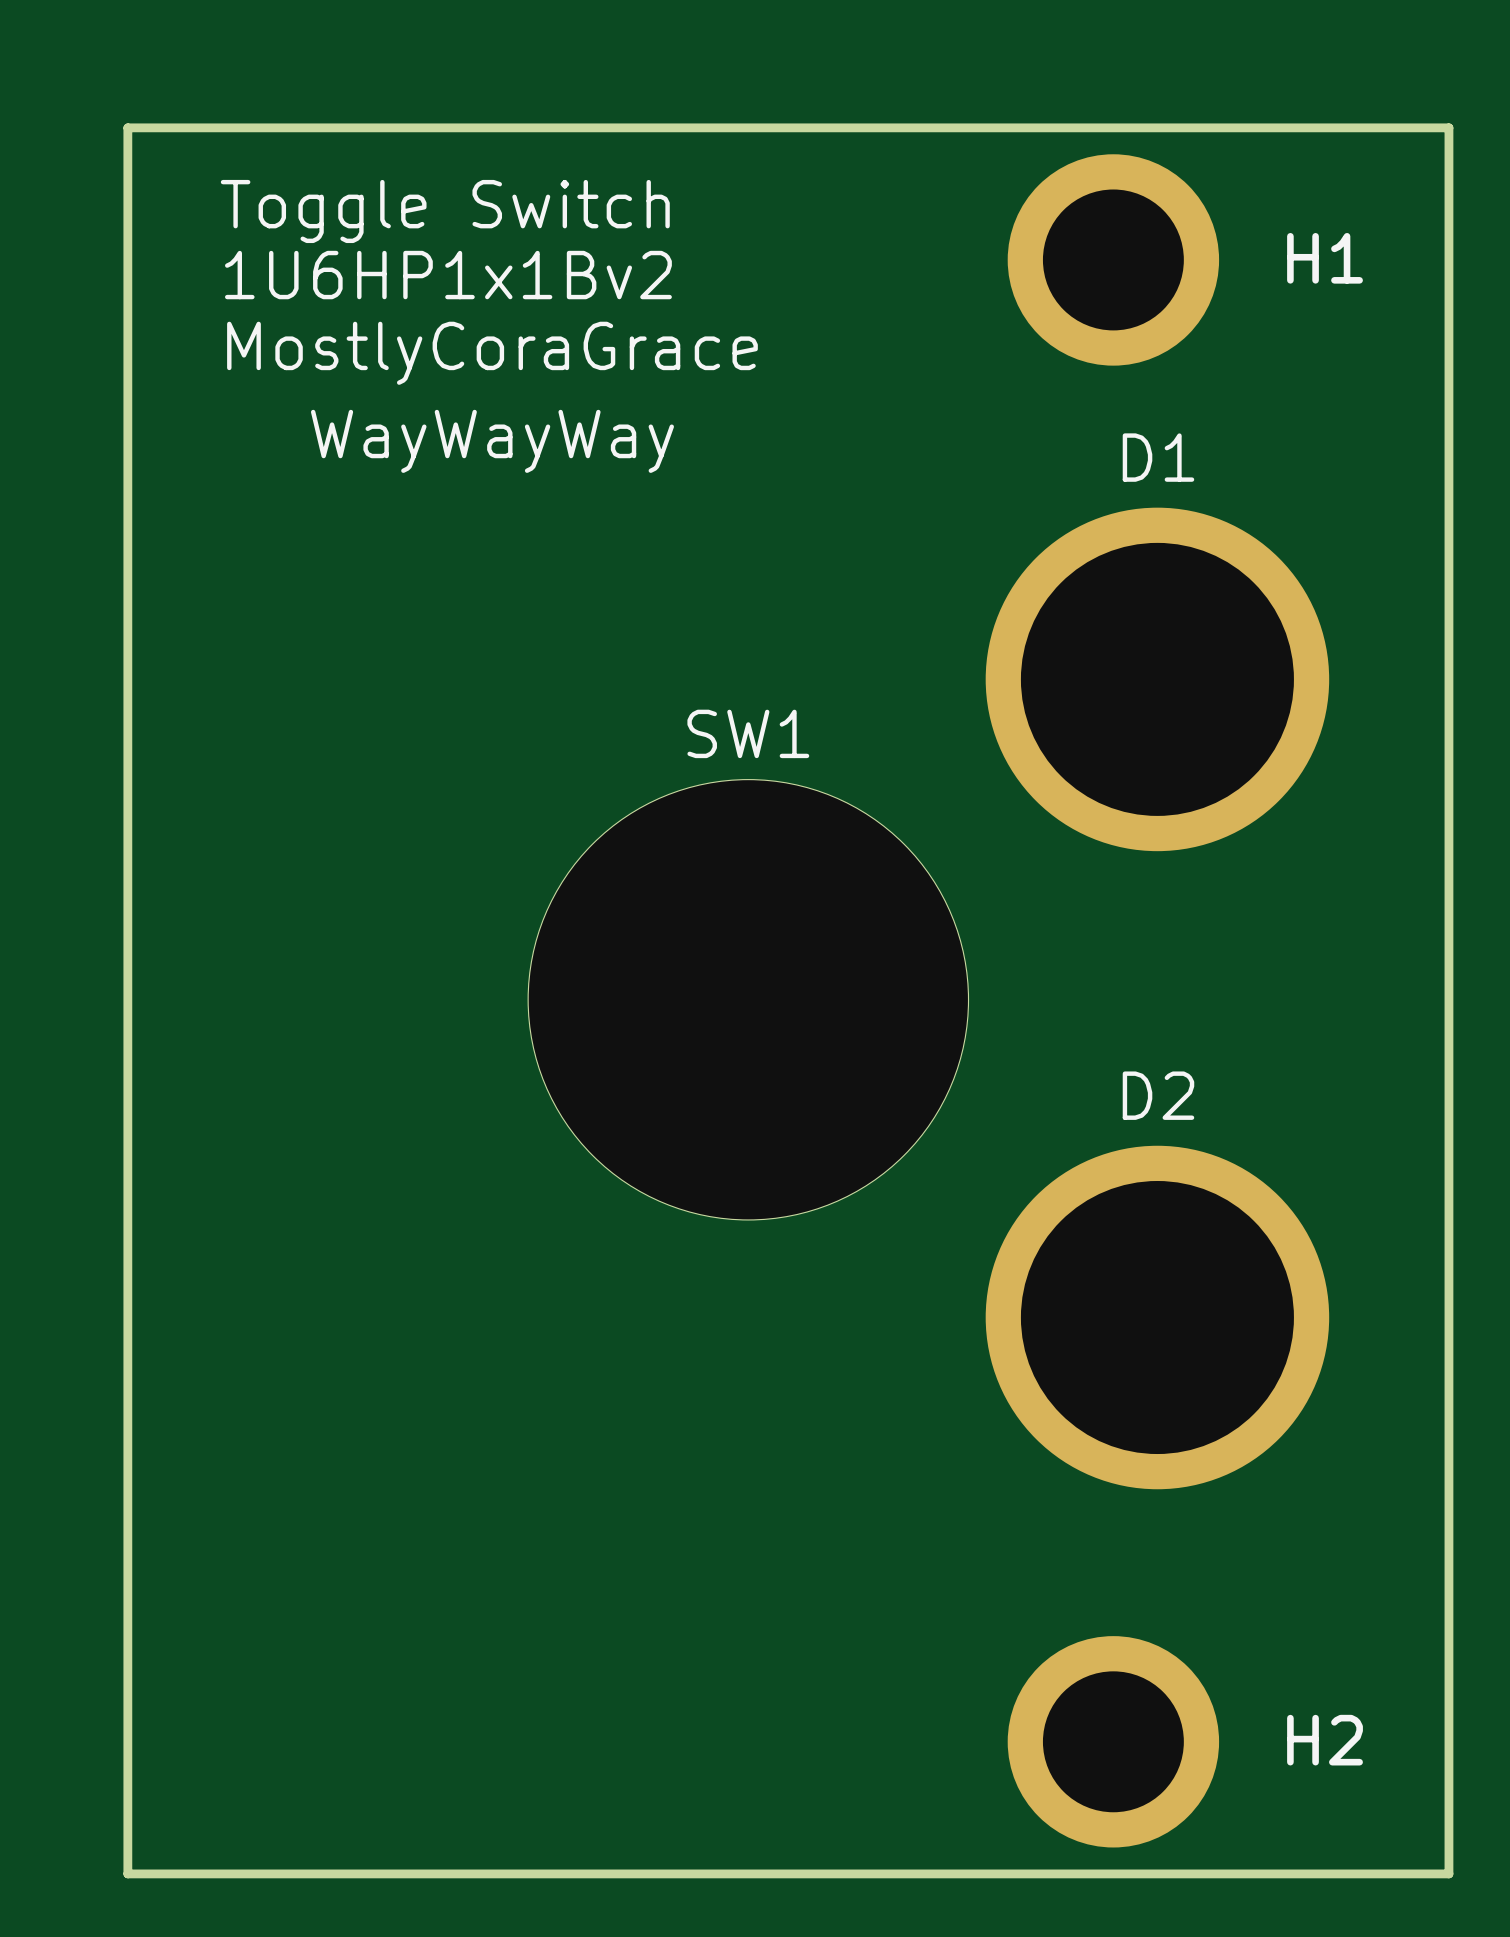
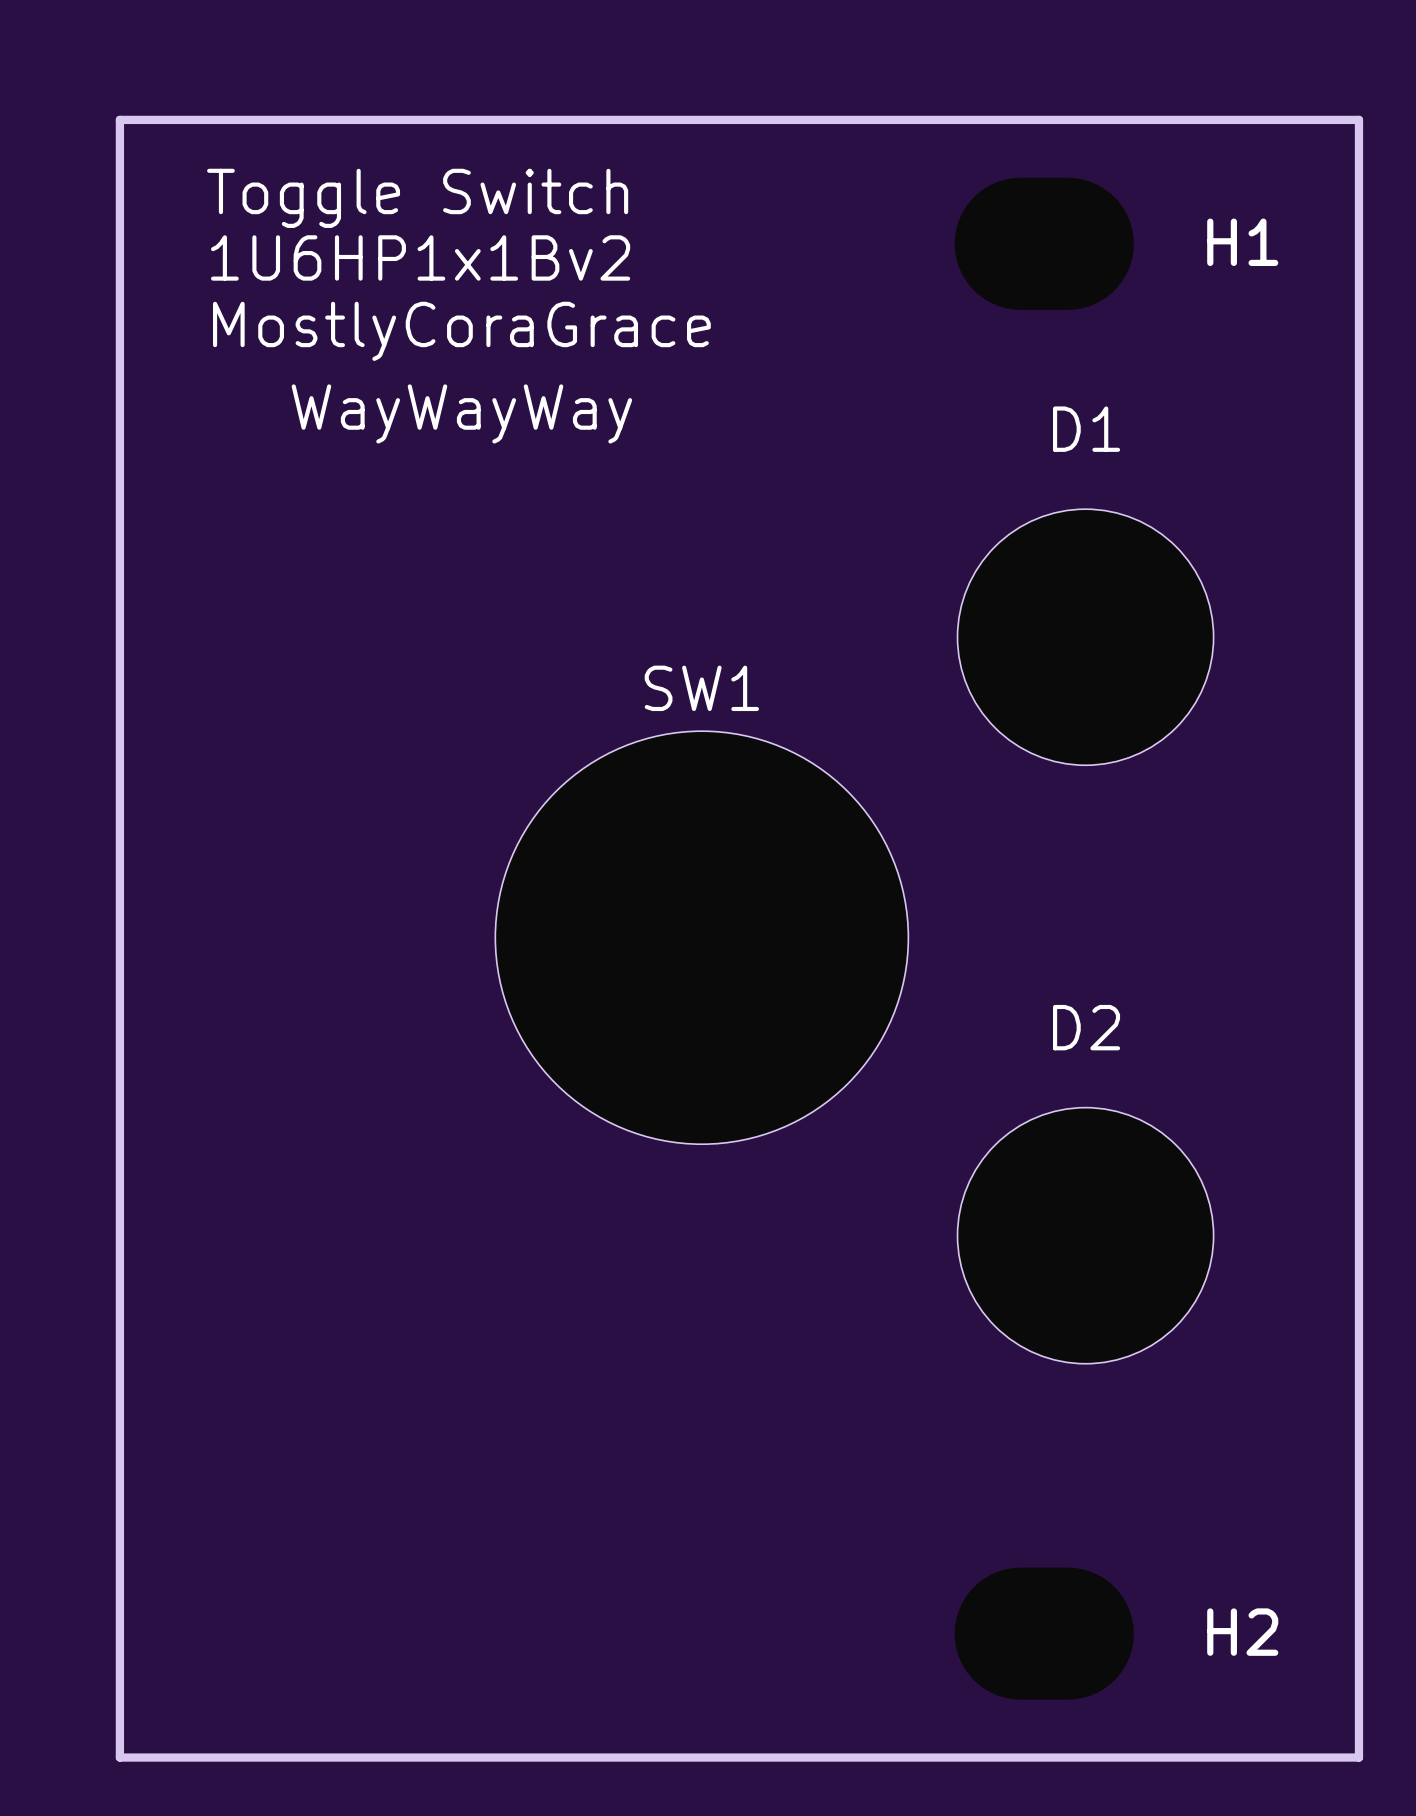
H1 footprint: [1007, 154, 1220, 366] -> [954, 177, 1134, 310]
D1 footprint: [985, 507, 1330, 852] -> [957, 509, 1214, 766]
D2 footprint: [985, 1145, 1330, 1490] -> [957, 1107, 1214, 1364]
H2 footprint: [1007, 1636, 1220, 1848] -> [954, 1567, 1134, 1700]

